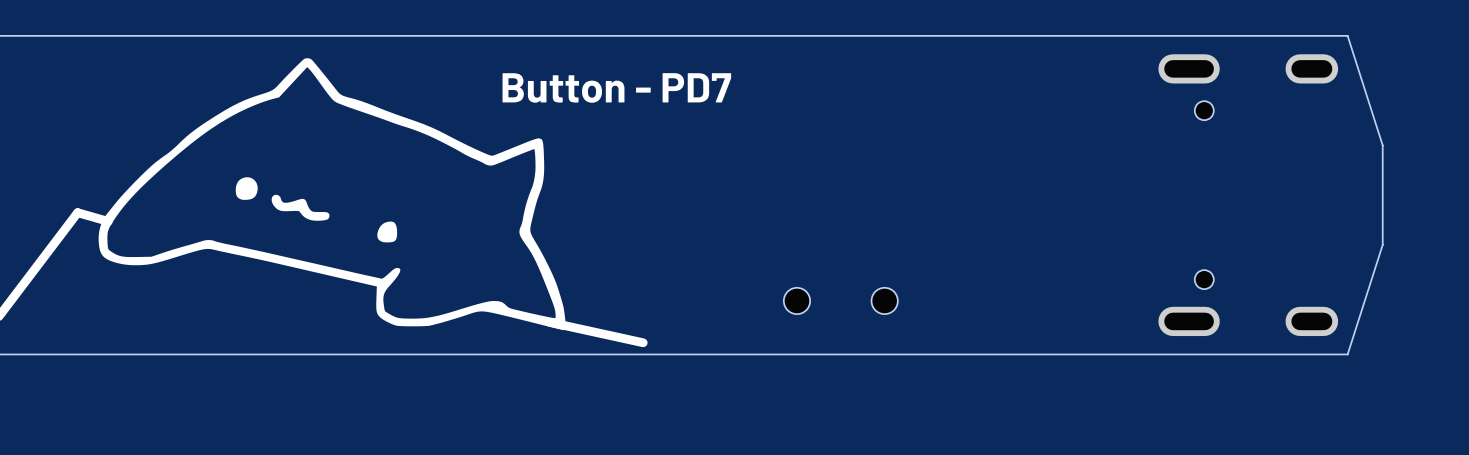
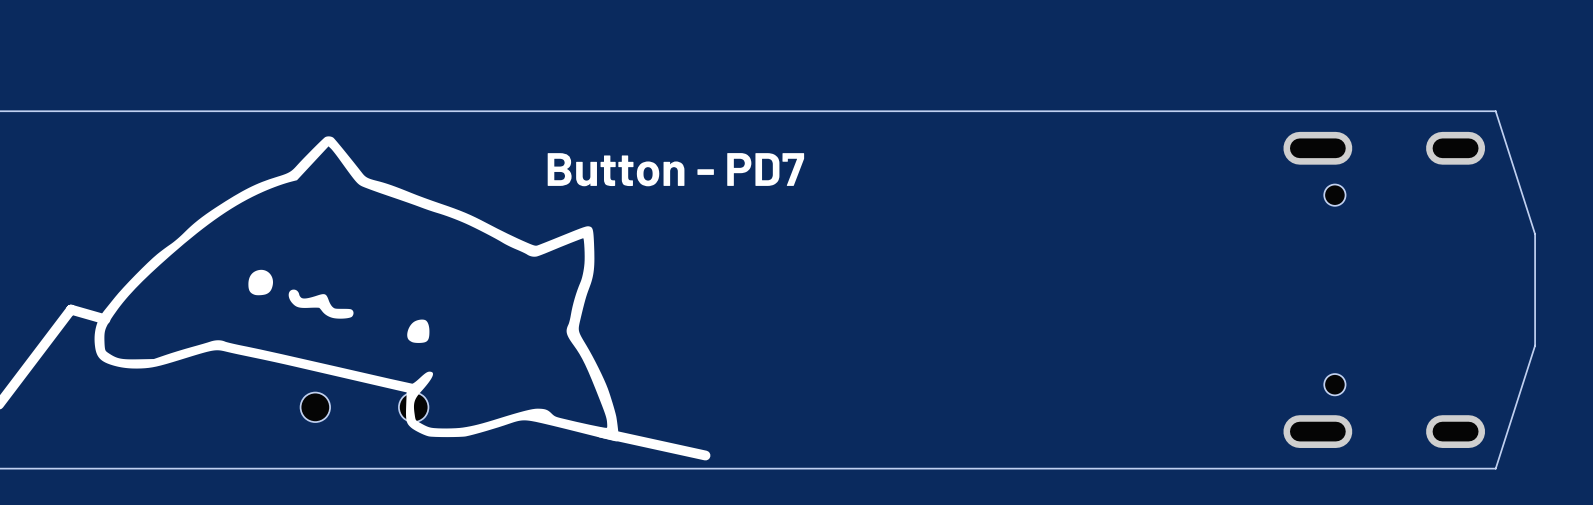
part position: (840, 300) -> (364, 407)

